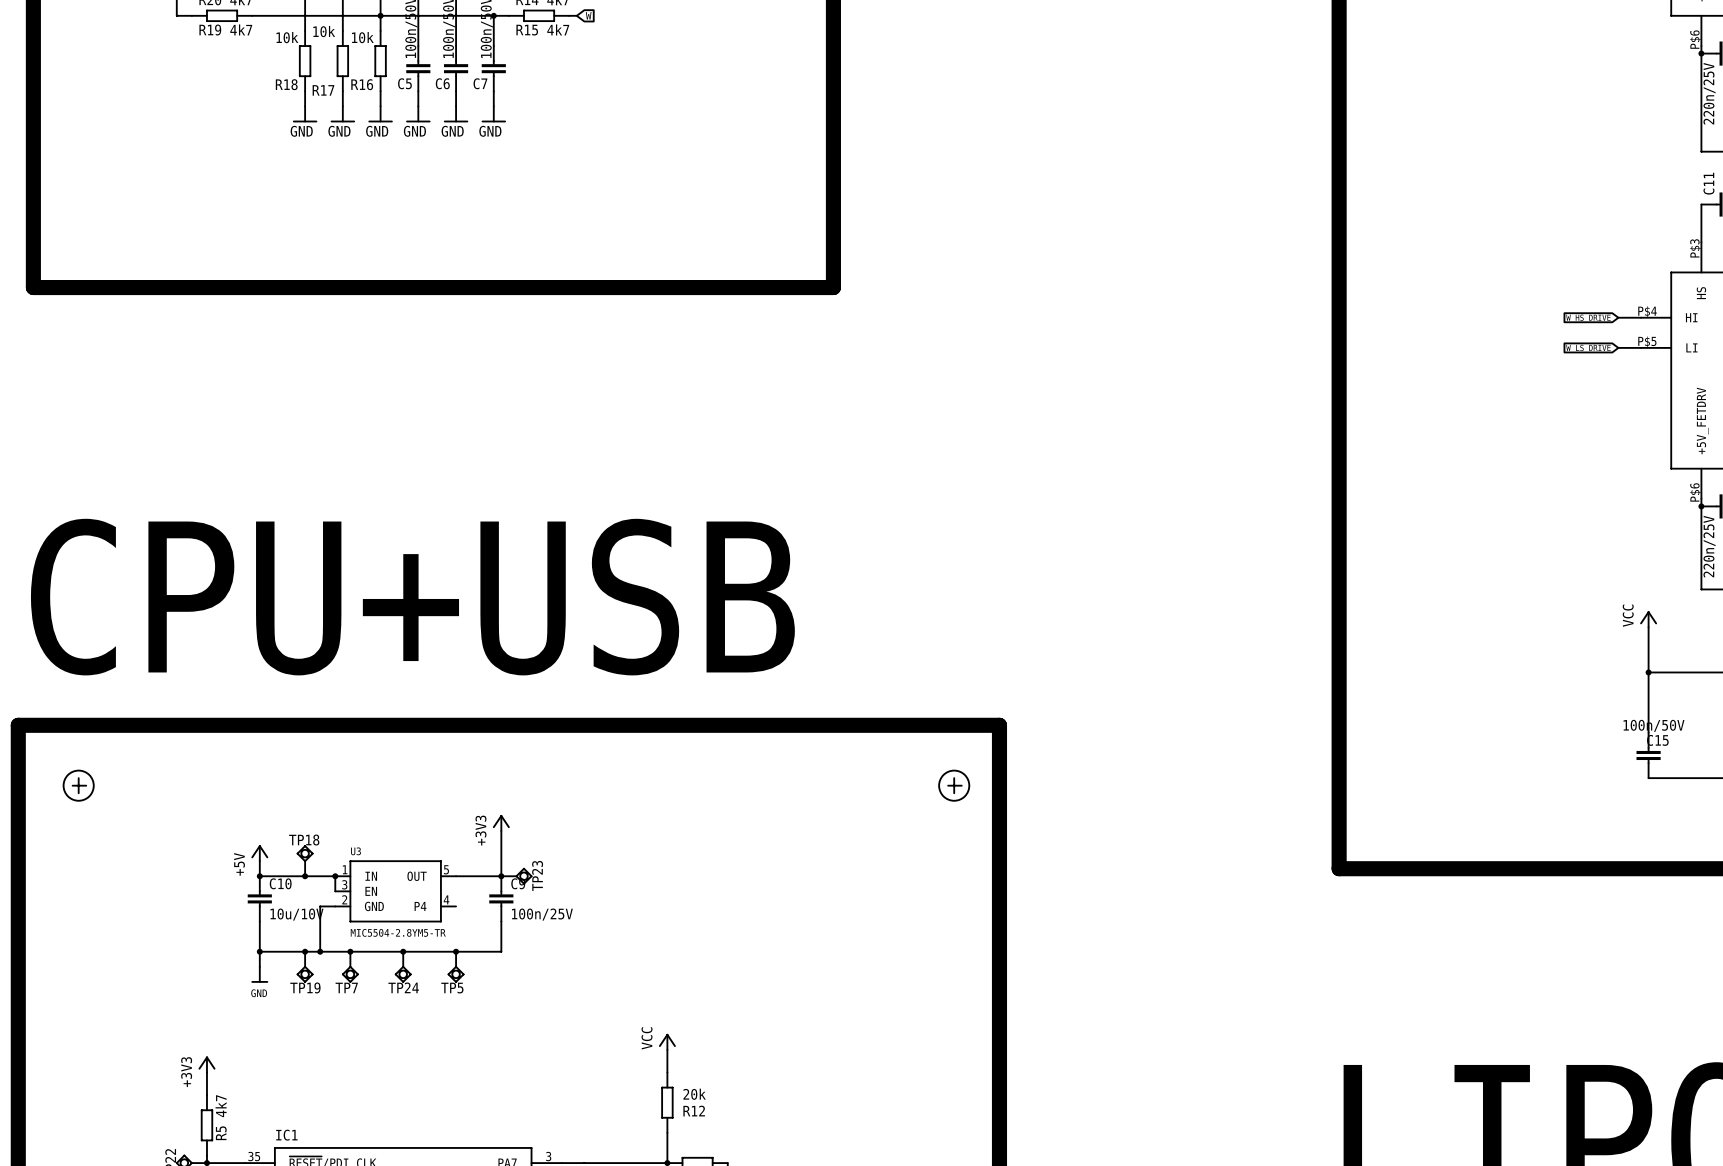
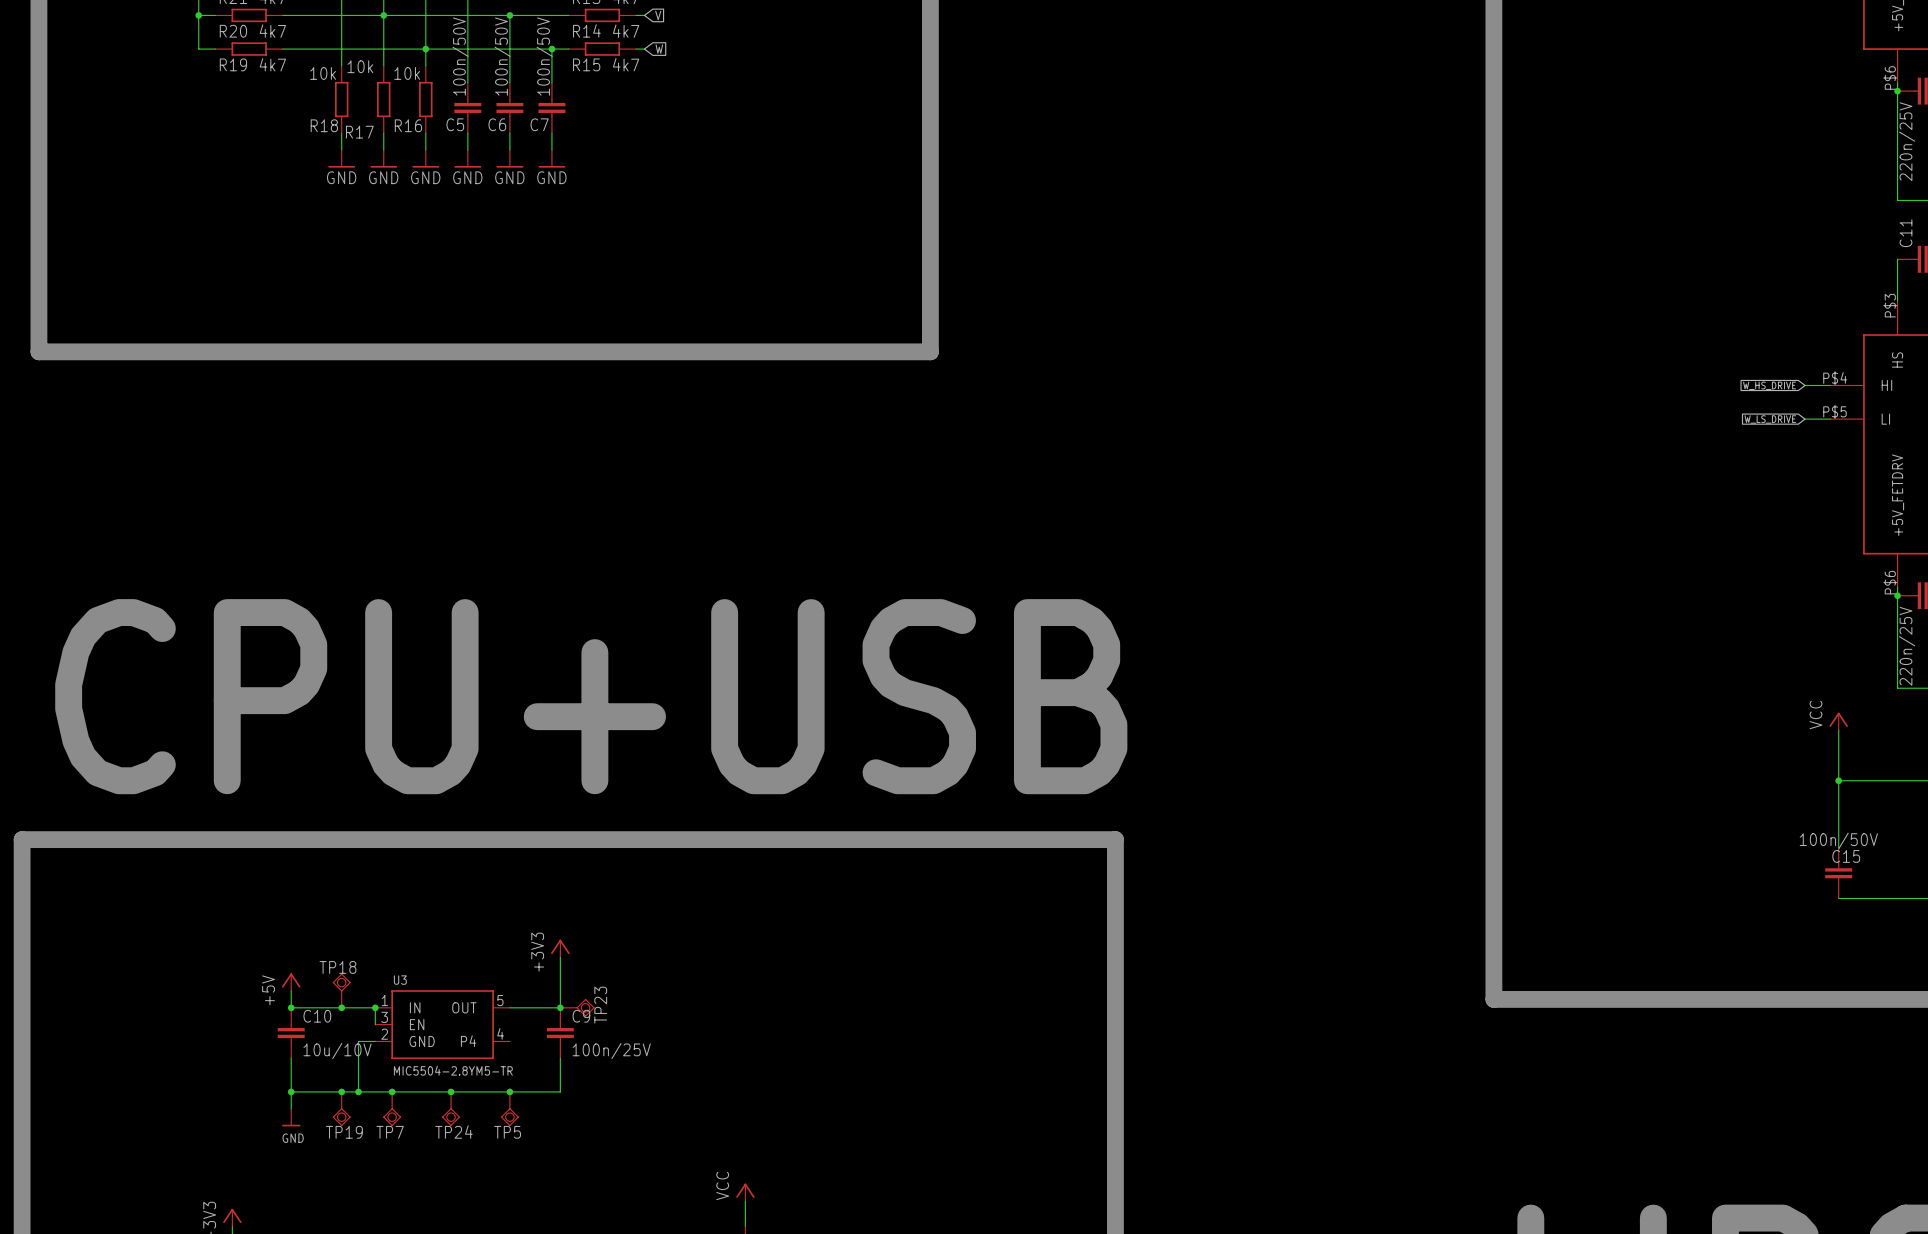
part: (78, 785) -> none
part: (954, 785) -> none

